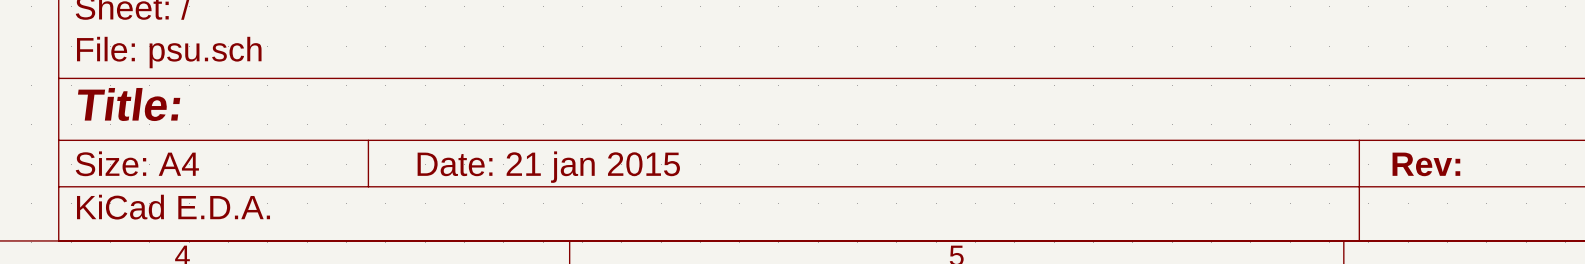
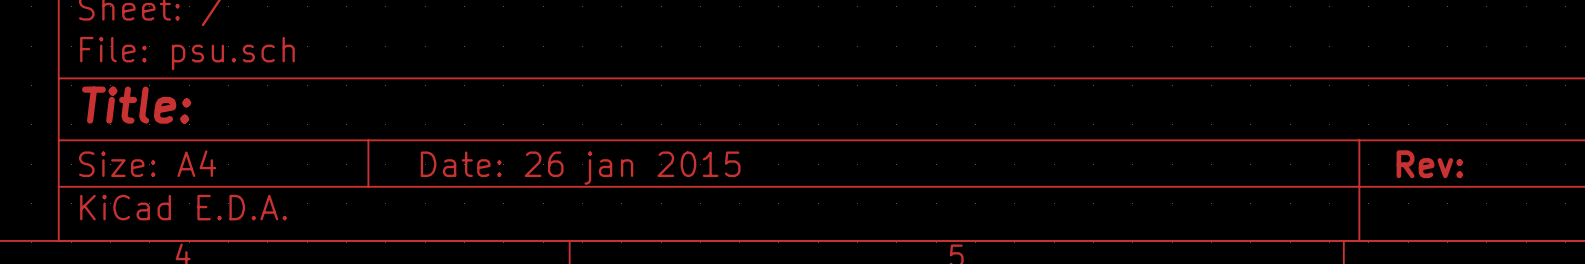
title block: Date: 21 jan 2015 (548, 167) -> Date: 26 jan 2015 (580, 168)

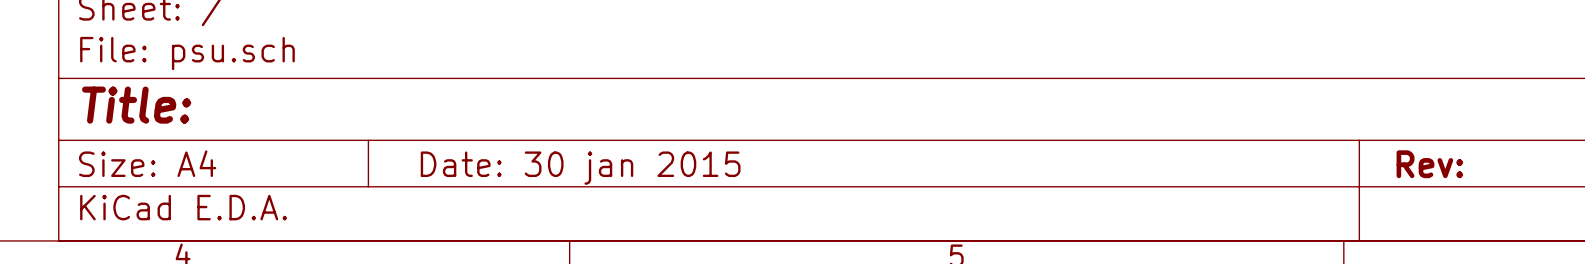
title block: Date: 26 jan 2015 (580, 168) -> Date: 30 jan 2015 (580, 168)

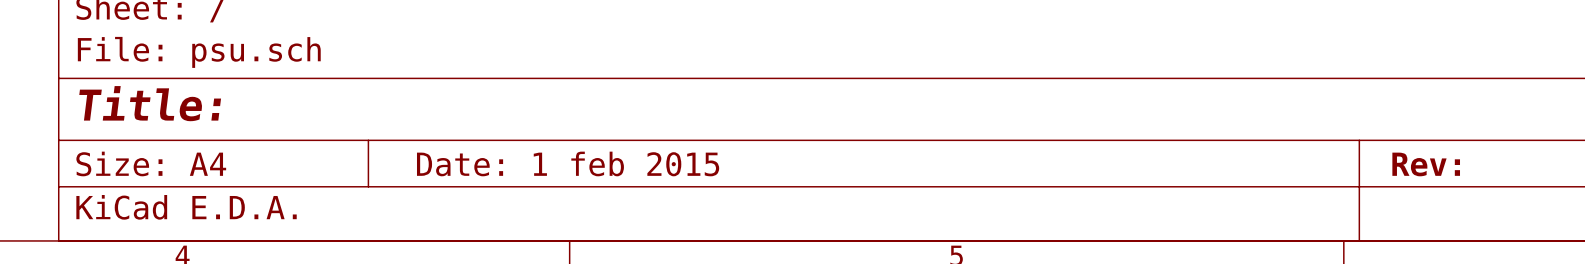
title block: Date: 30 jan 2015 (580, 168) -> Date: 1 feb 2015 (568, 163)

